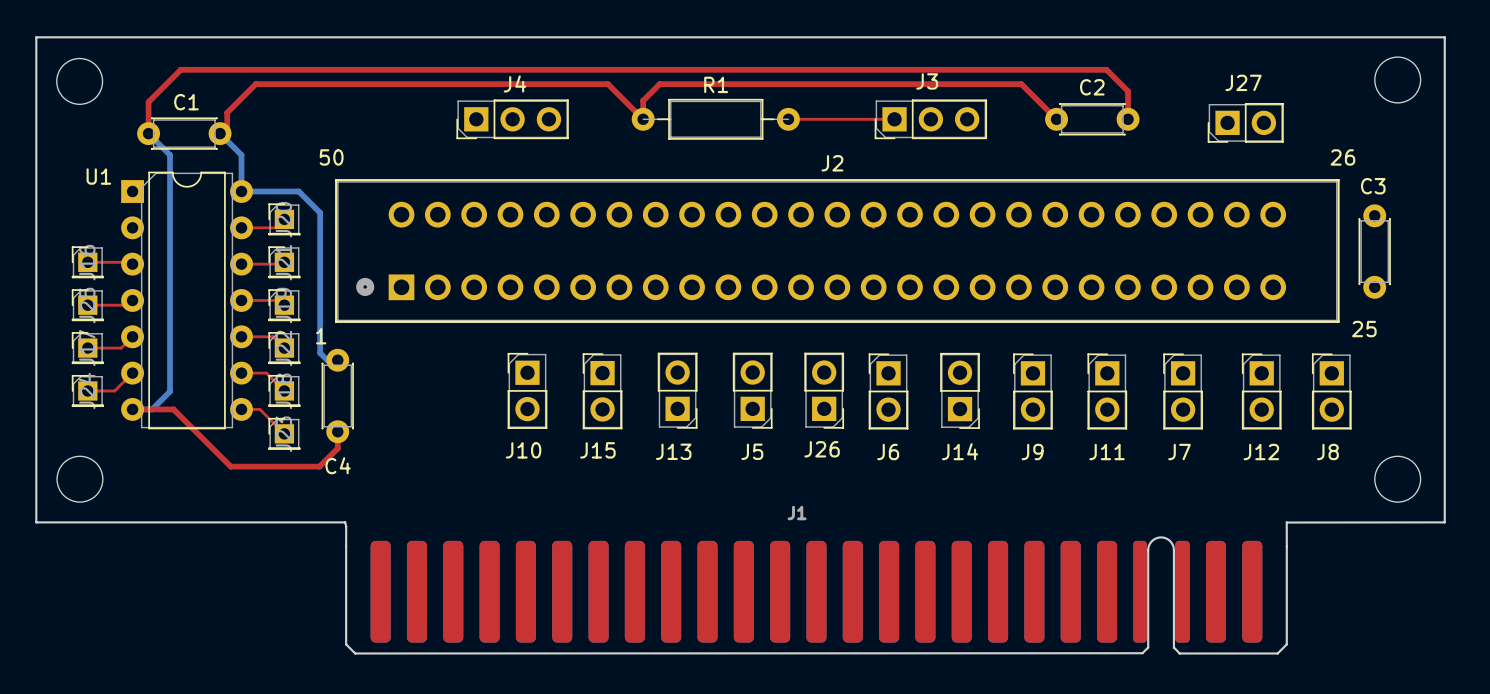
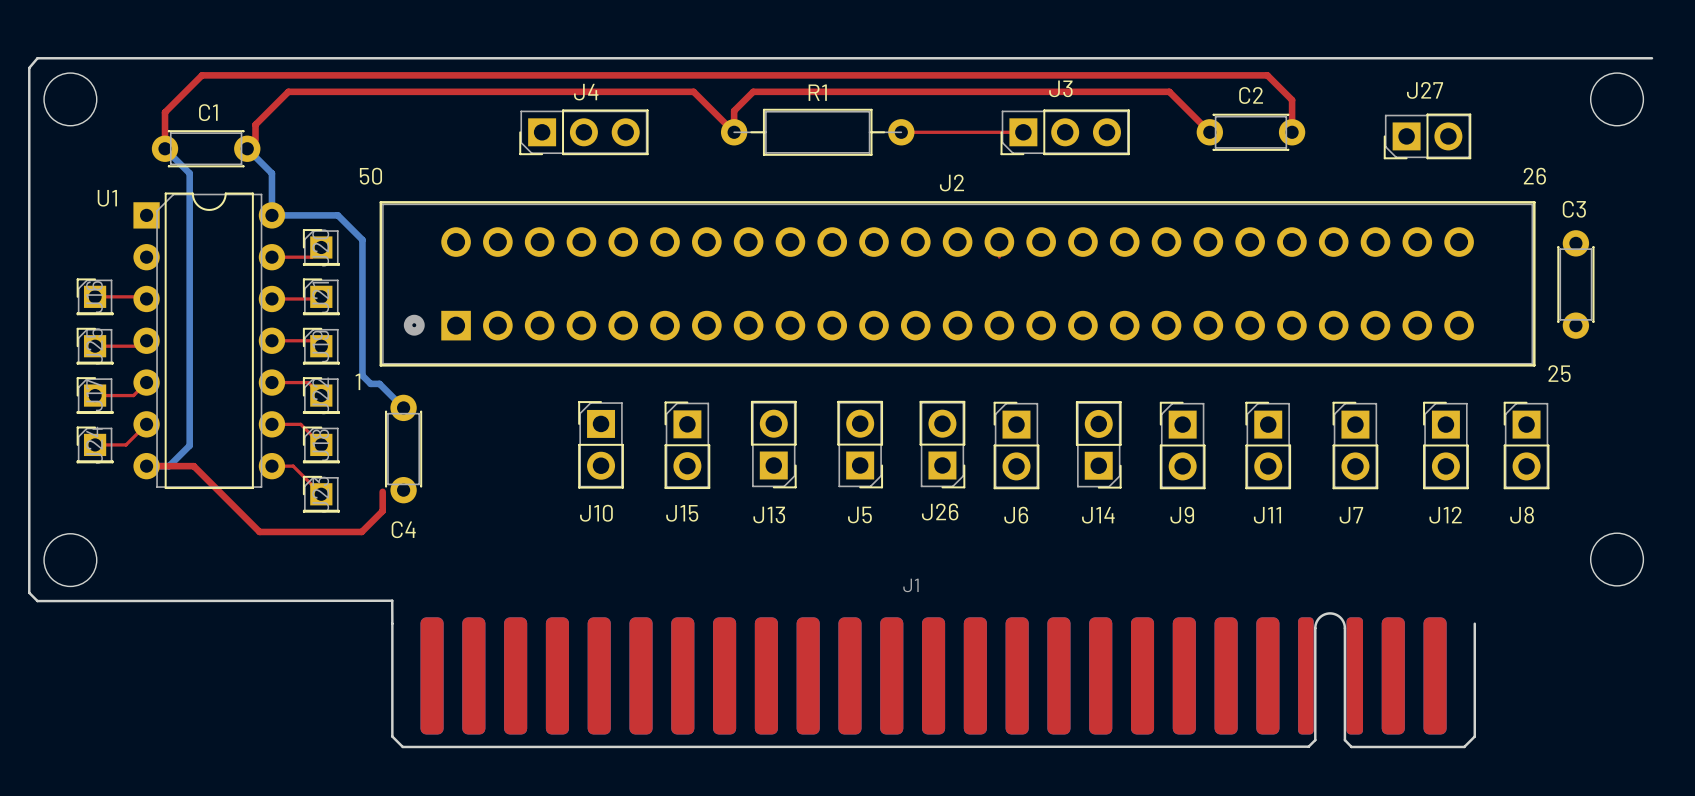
round board edge position: (1397, 79) -> (1617, 99)
round board edge position: (79, 81) -> (70, 99)
bottom track: (320, 330) (320, 353) (327, 360) (337, 360) -> (362, 375) (370, 383) (379, 383) (403, 407)
C4 position: (337, 395) -> (403, 449)
round board edge position: (79, 479) -> (70, 560)
round board edge position: (1397, 479) -> (1617, 559)
board edge: (346, 546) (345, 522) (36, 522) (36, 37) (1444, 37) (1444, 522) (1286, 522) (1286, 546) -> (392, 623) (392, 600) (37, 601) (29, 592) (29, 67) (37, 58) (1652, 58)

